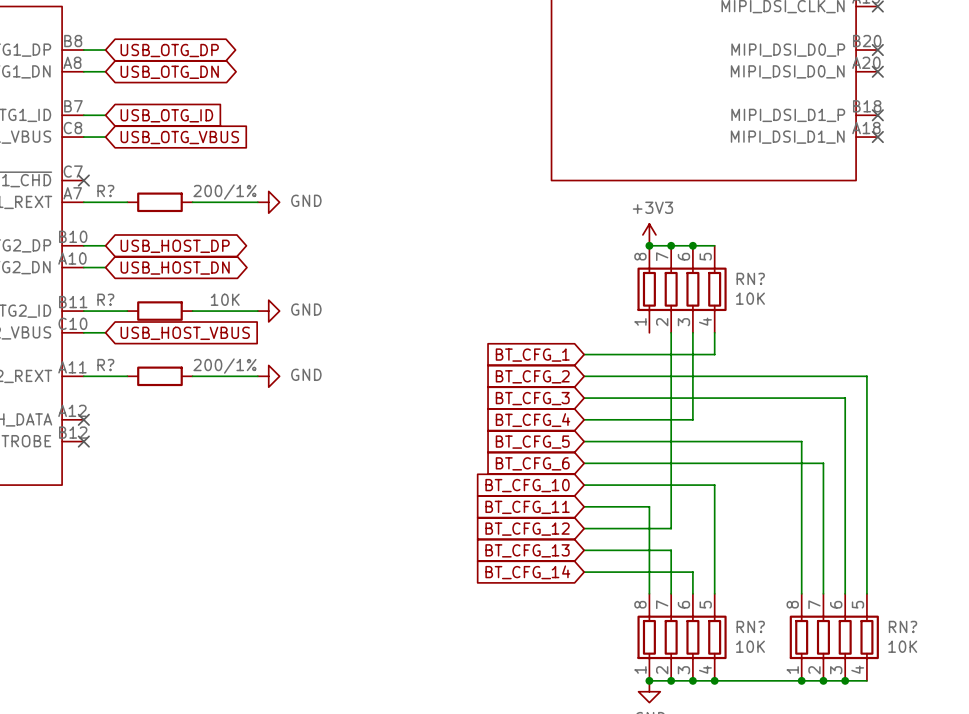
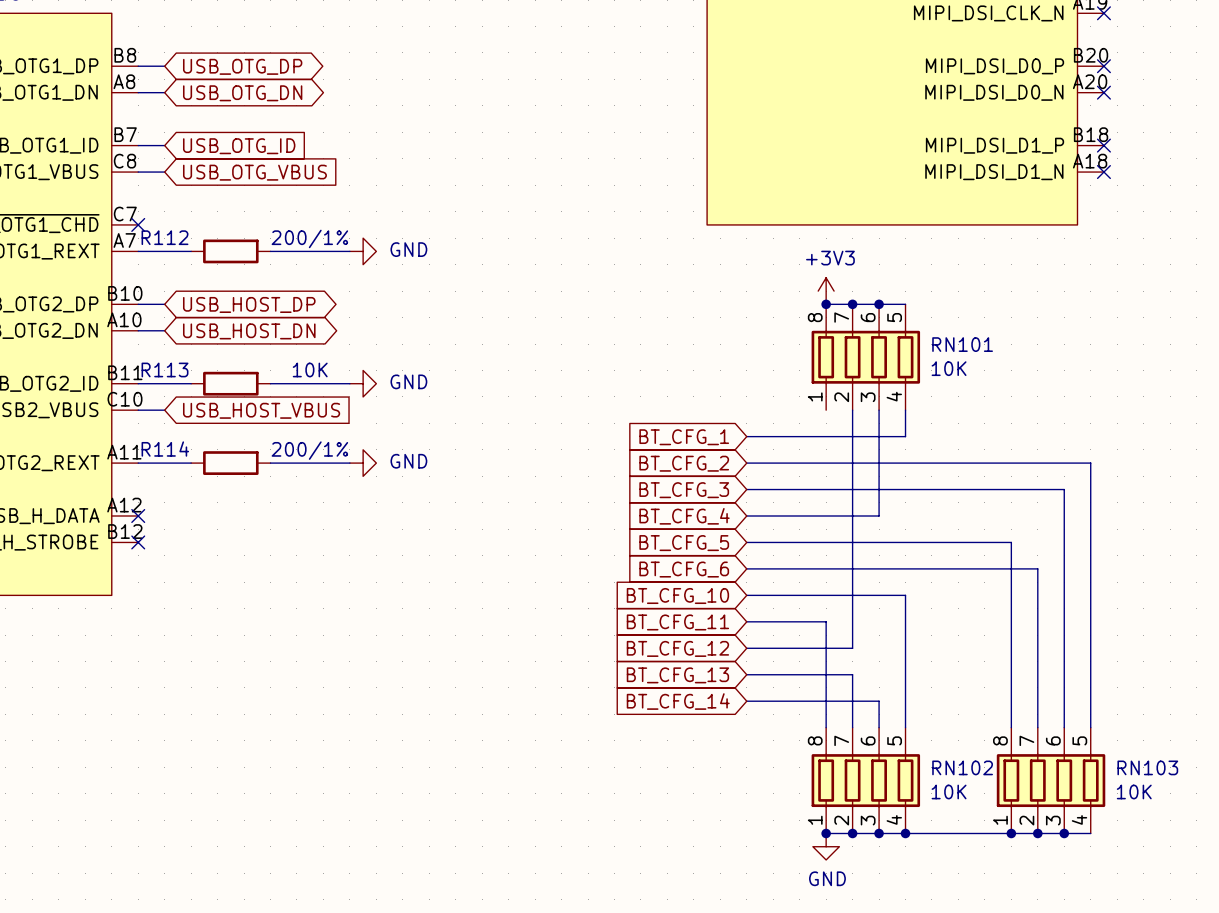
R? name: R? (105, 191) -> R112 (165, 237)
RN? name: RN? (750, 278) -> RN101 (962, 344)
R? name: R? (105, 299) -> R113 (165, 369)
R? name: R? (105, 365) -> R114 (165, 449)
RN? name: RN? (750, 626) -> RN102 (962, 767)
RN? name: RN? (903, 626) -> RN103 (1147, 767)

